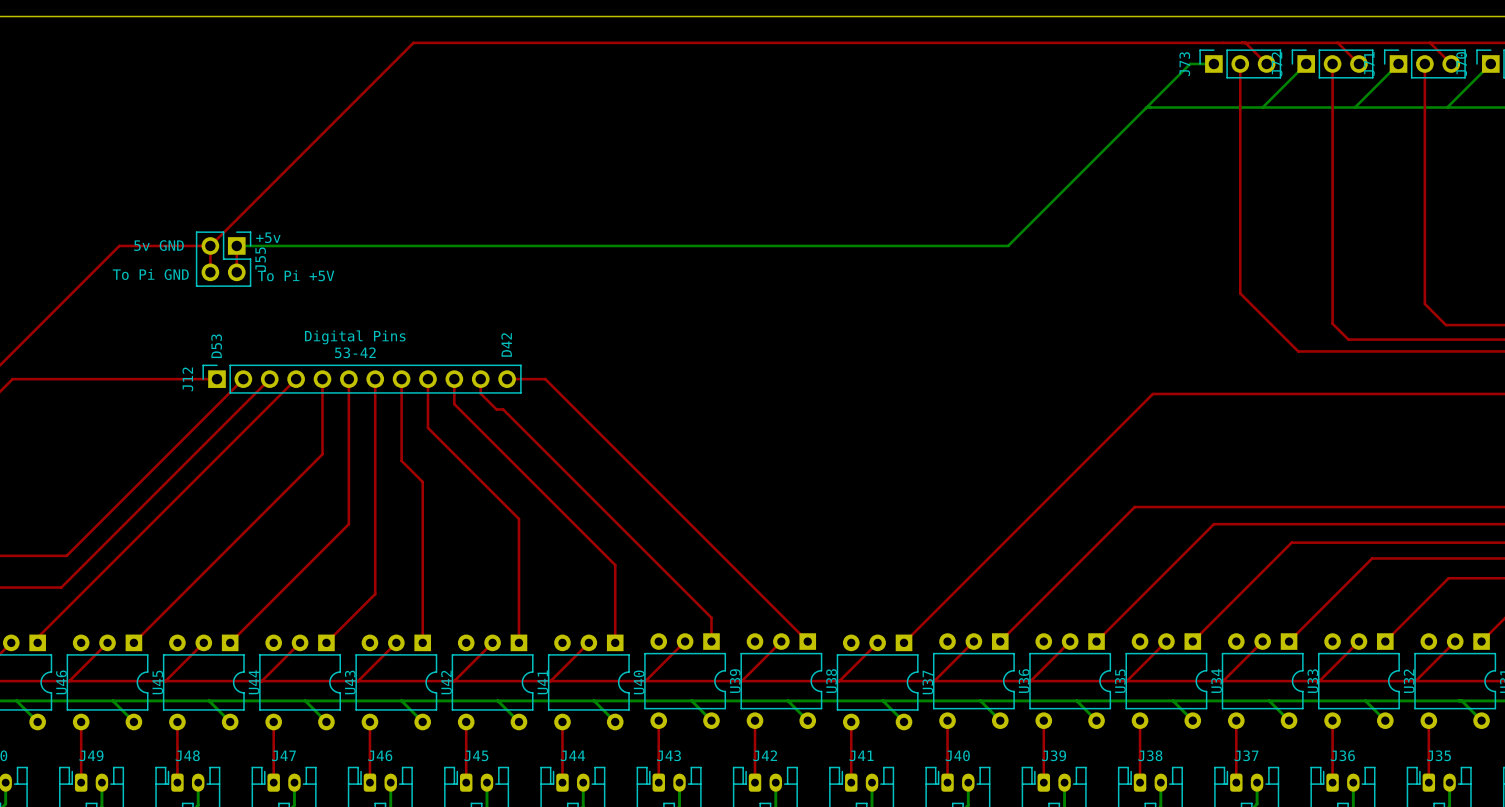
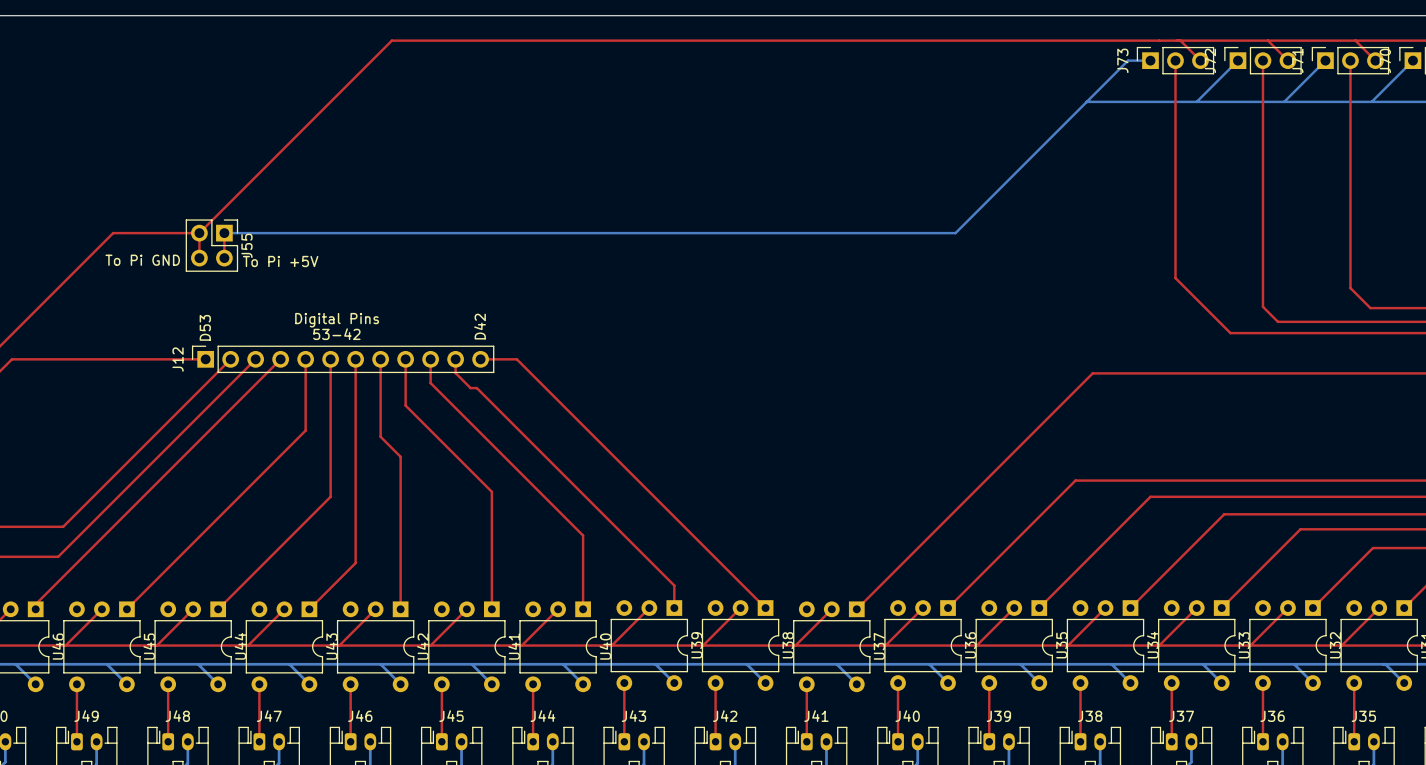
text: +5v (268, 237) -> none
text: 5v GND (159, 245) -> none

